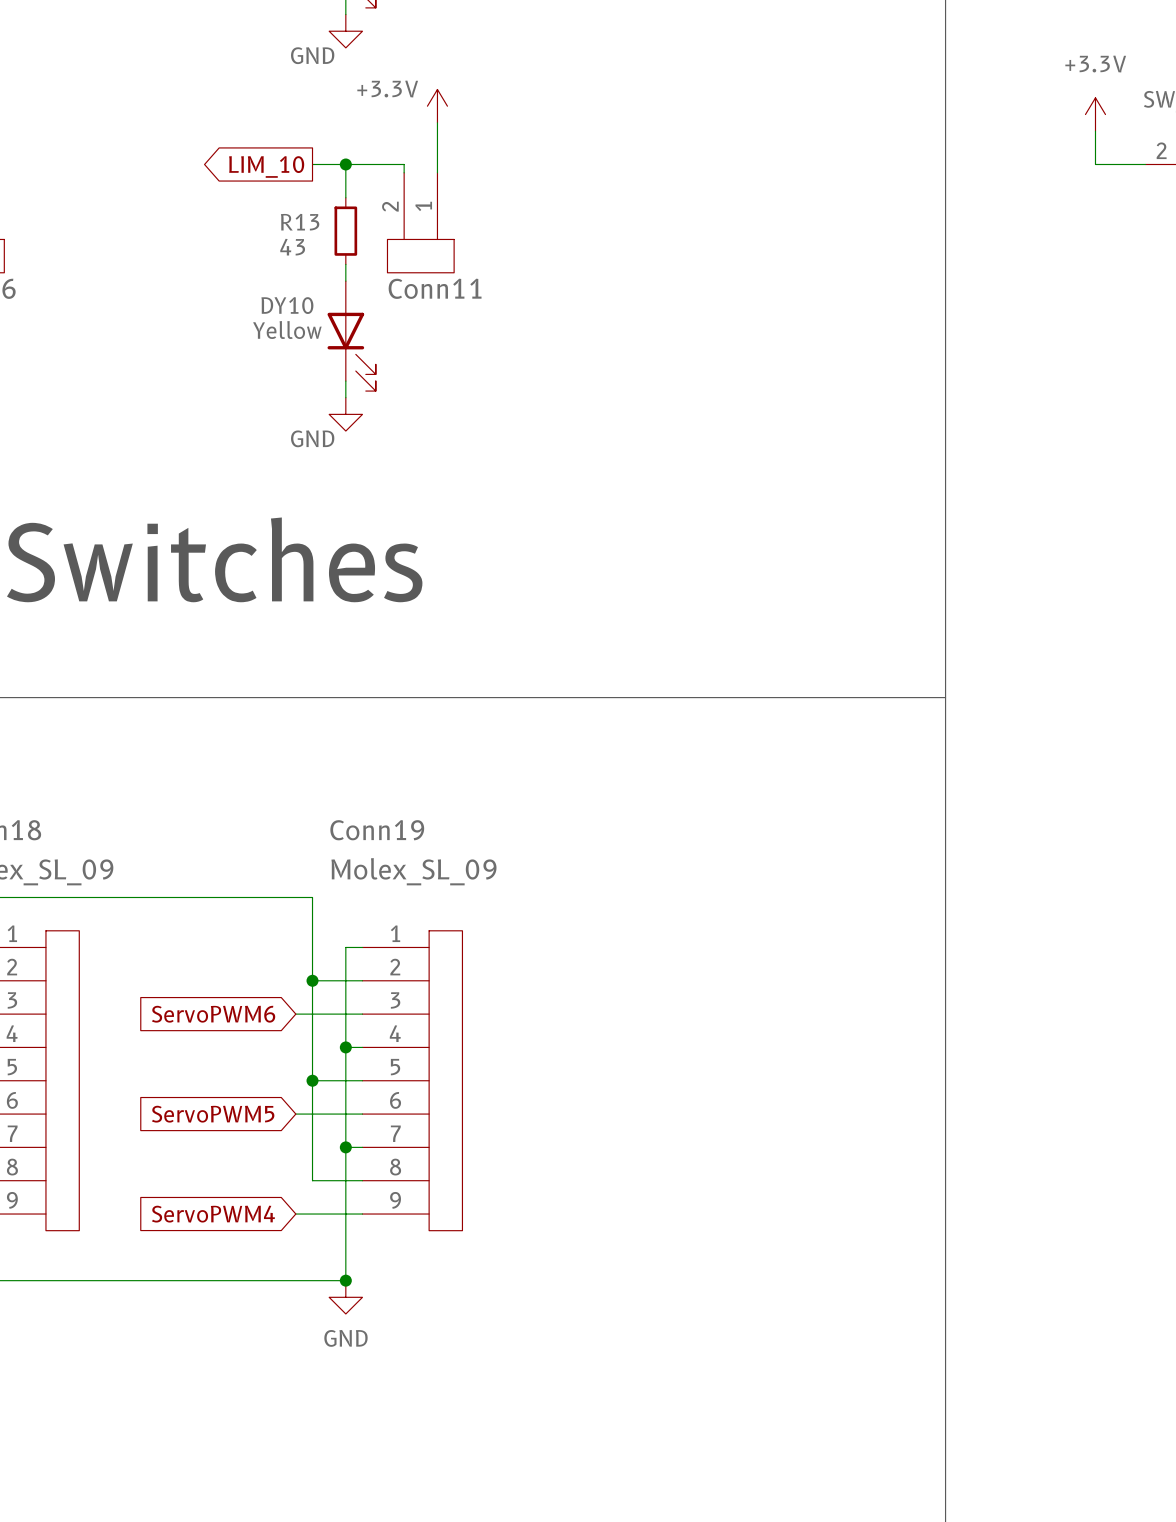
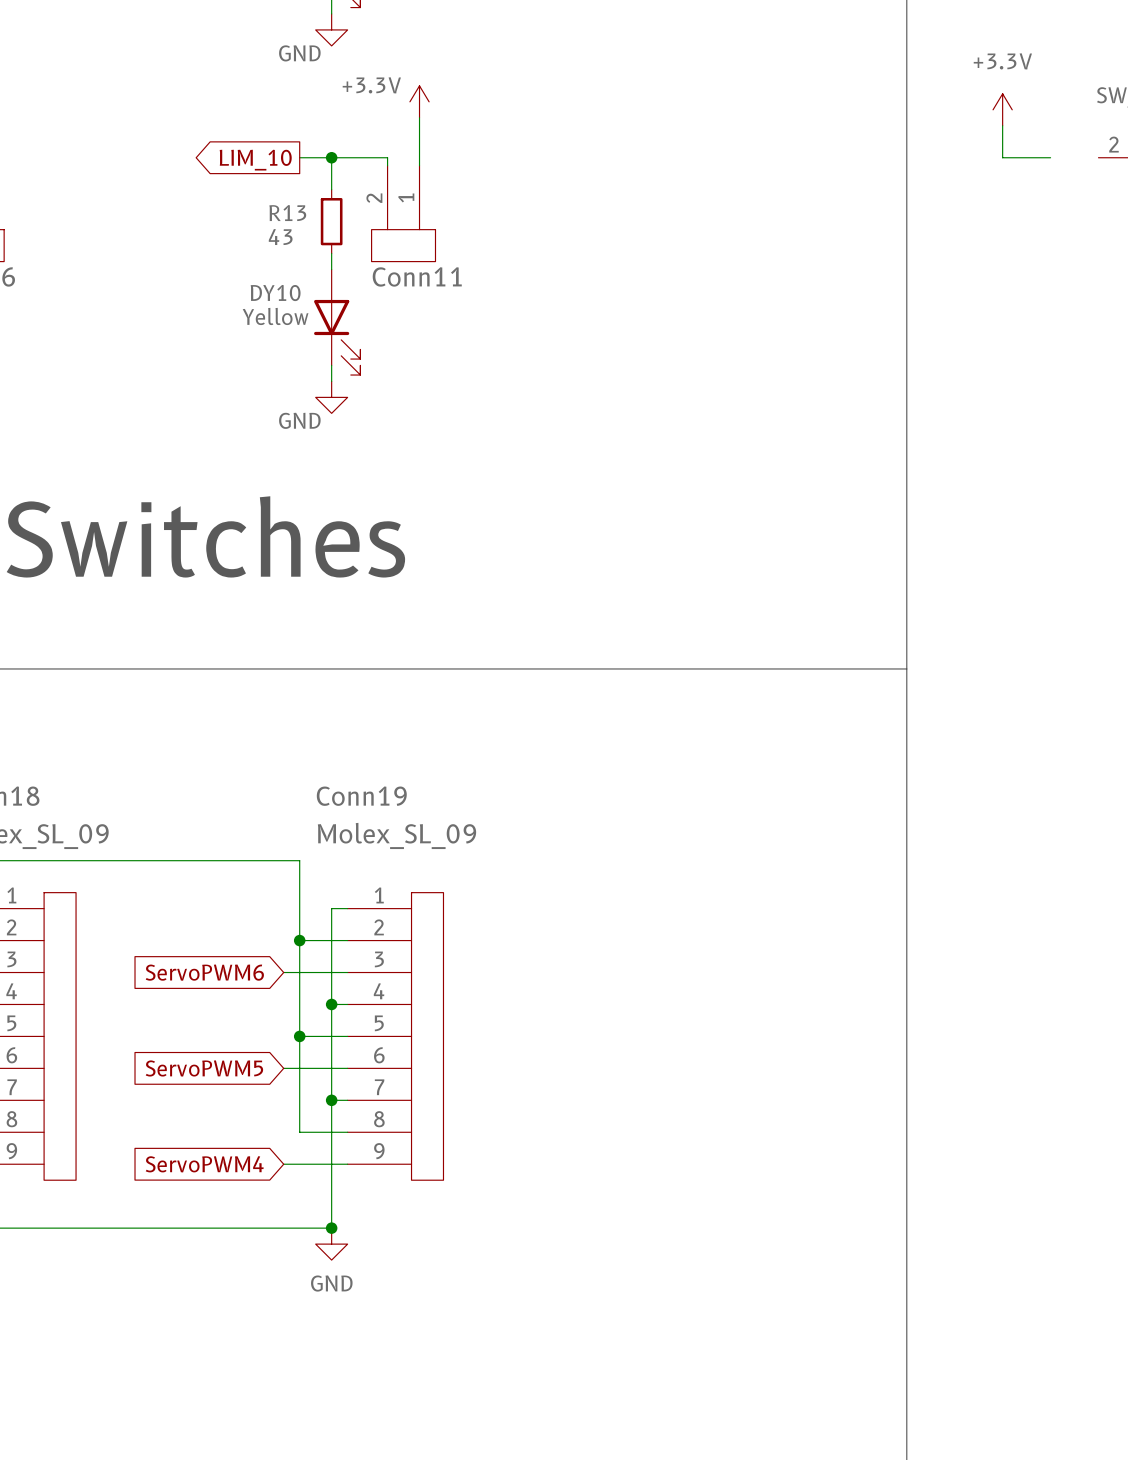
power symbol position: +3.3V (1095, 114) -> +3.3V (1002, 109)
wire: (1095, 131) (1095, 164) (1145, 164) -> (1002, 125) (1002, 157) (1050, 157)

